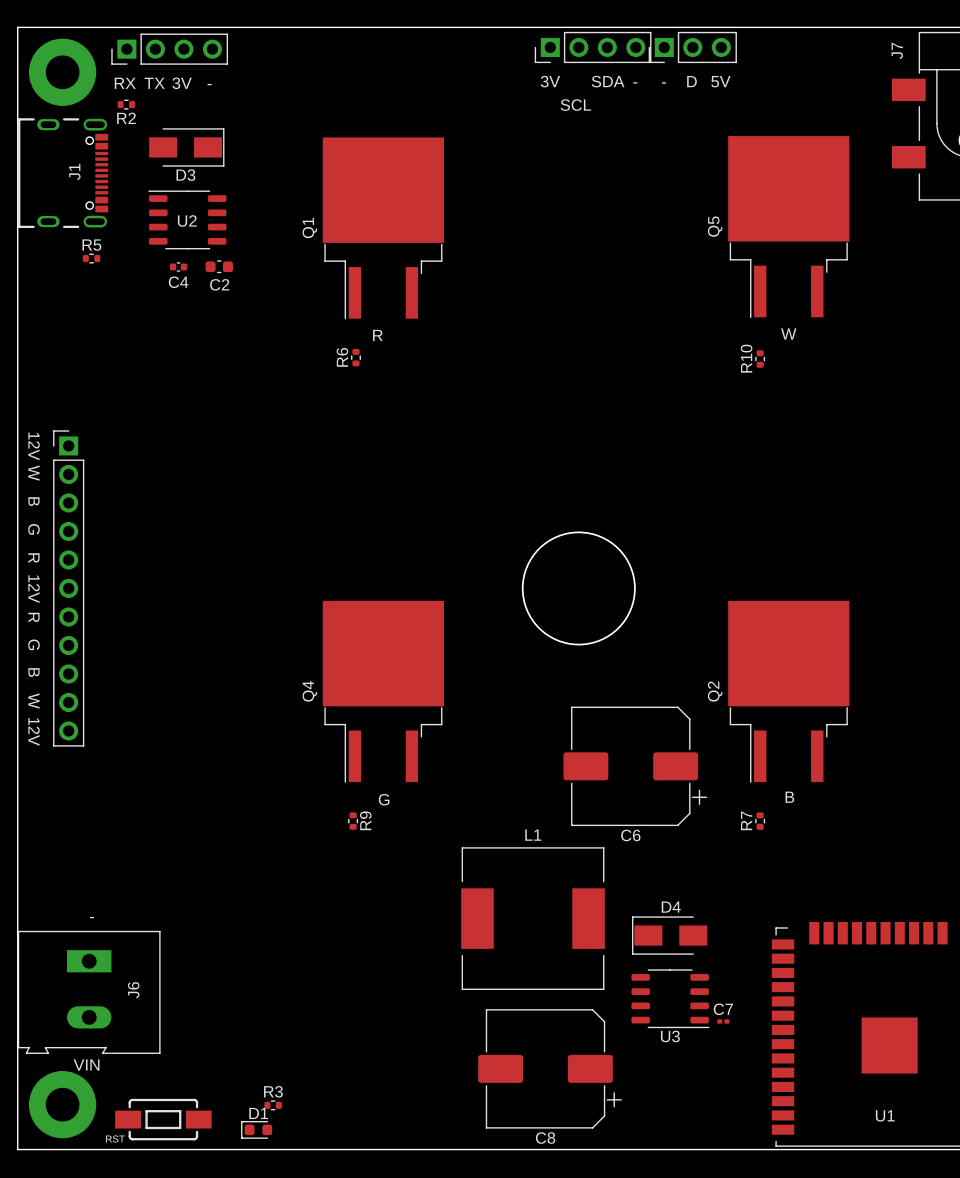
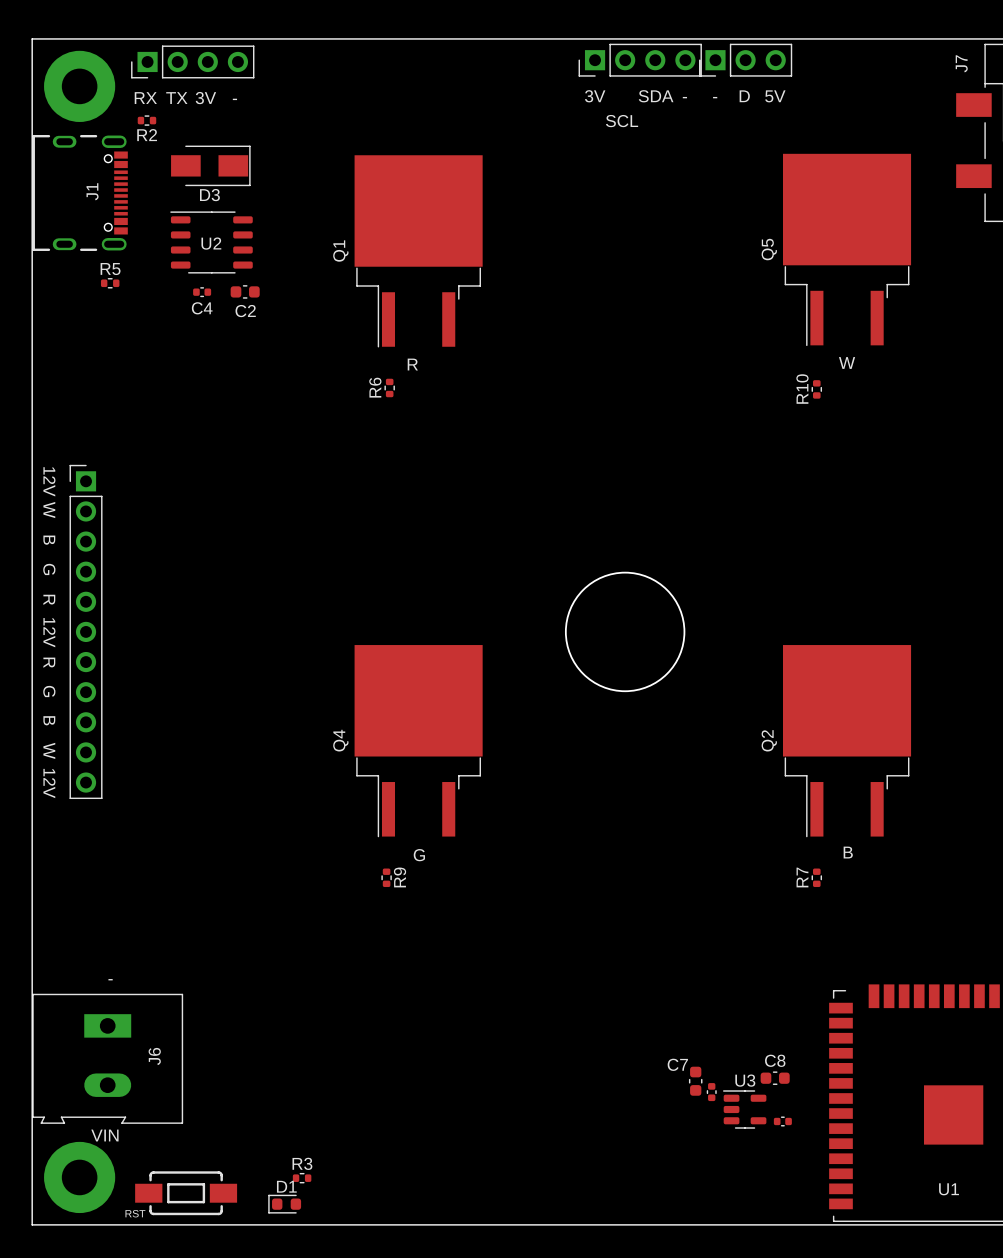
C6: (635, 766) -> none
L1: (533, 918) -> none
D4: (669, 935) -> none
U3 footprint: [631, 969, 710, 1029] -> [722, 1090, 767, 1129]
C8 footprint: [478, 1009, 622, 1129] -> [760, 1071, 790, 1085]
C7 footprint: [717, 1019, 730, 1024] -> [688, 1066, 703, 1096]
part: none -> (711, 1092)
U3 name position: U3 (670, 1036) -> U3 (745, 1080)
part: none -> (782, 1121)
C8 name position: C8 (545, 1138) -> C8 (775, 1060)

